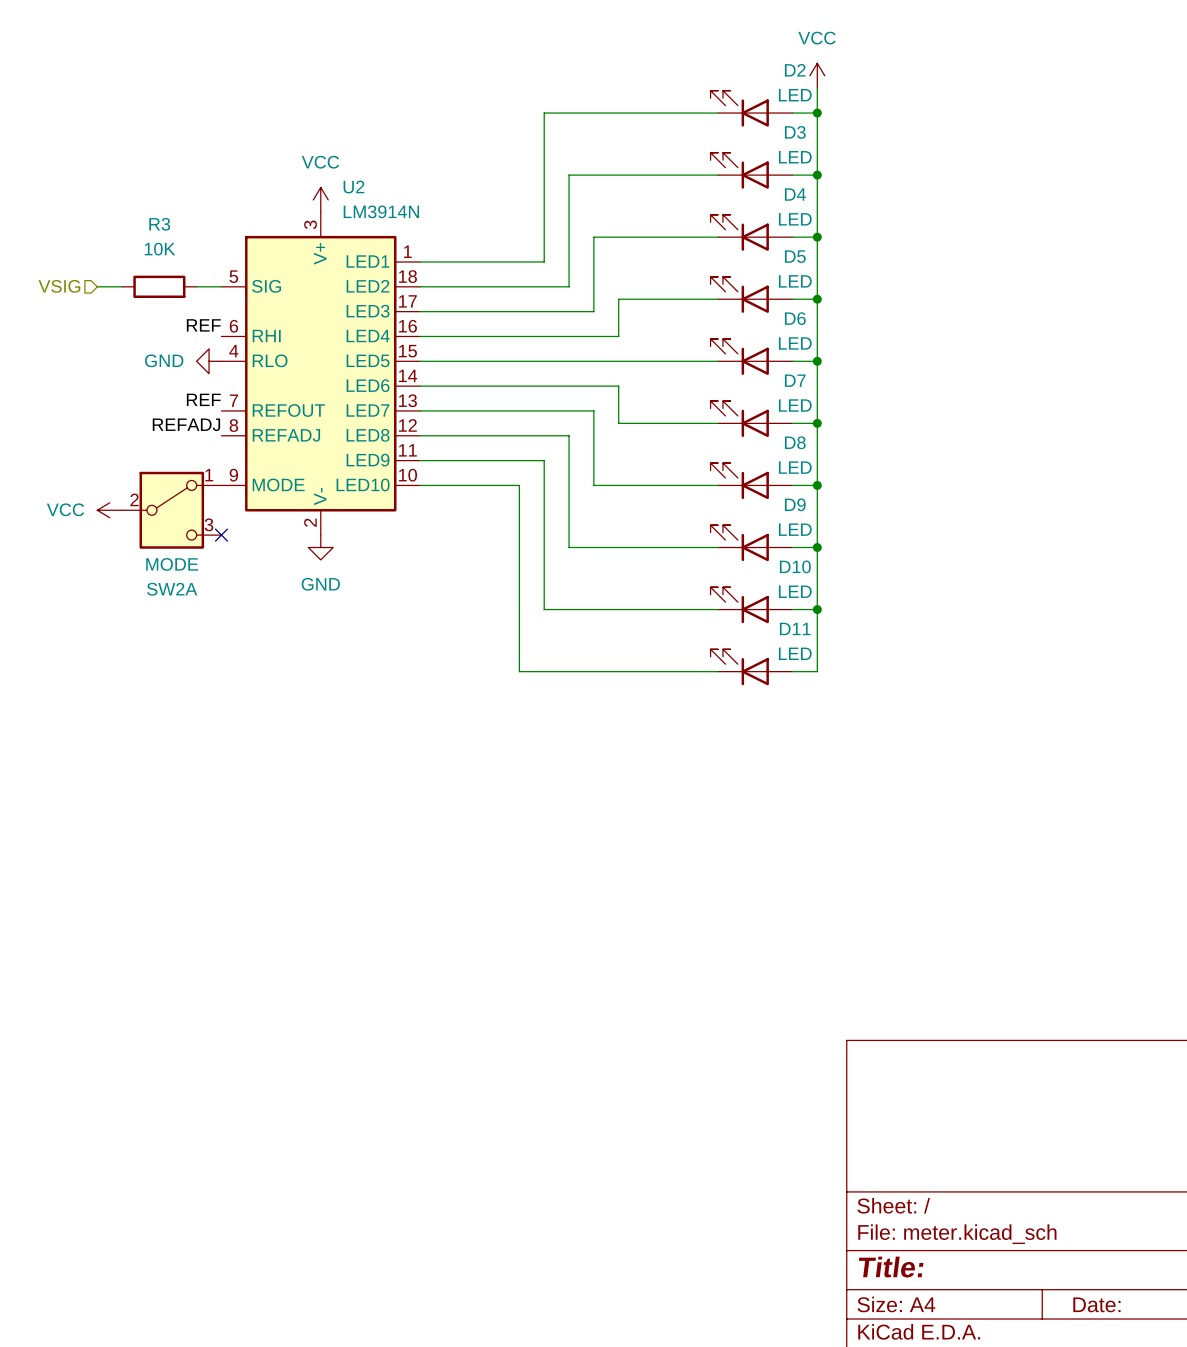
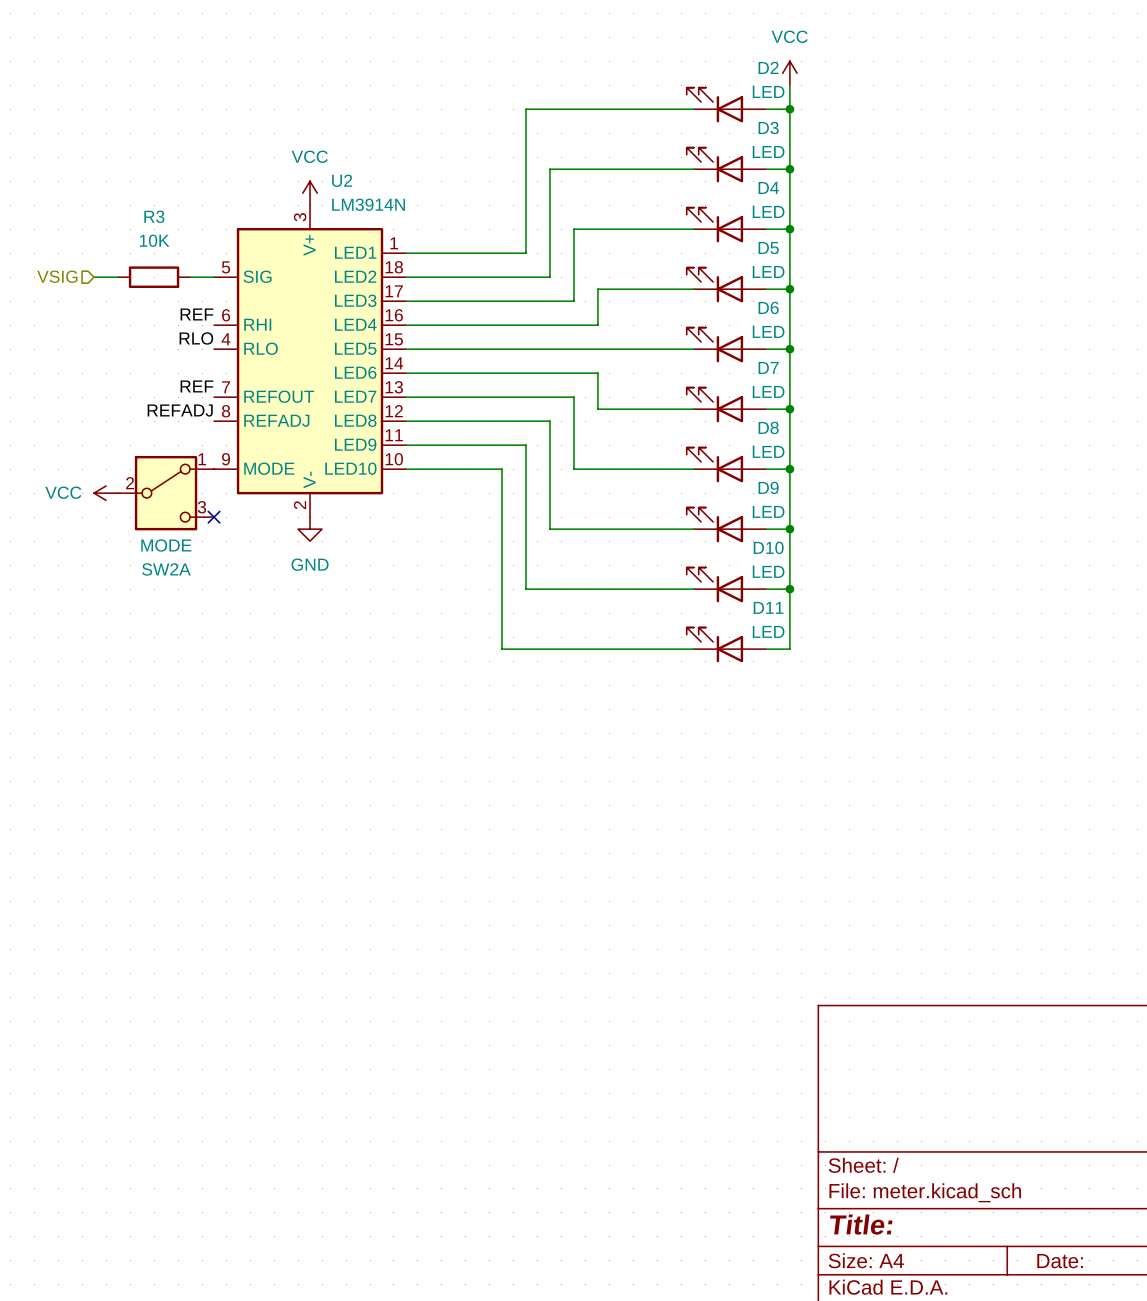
label: none -> RLO (196, 338)
power symbol: GND (209, 361) -> none

